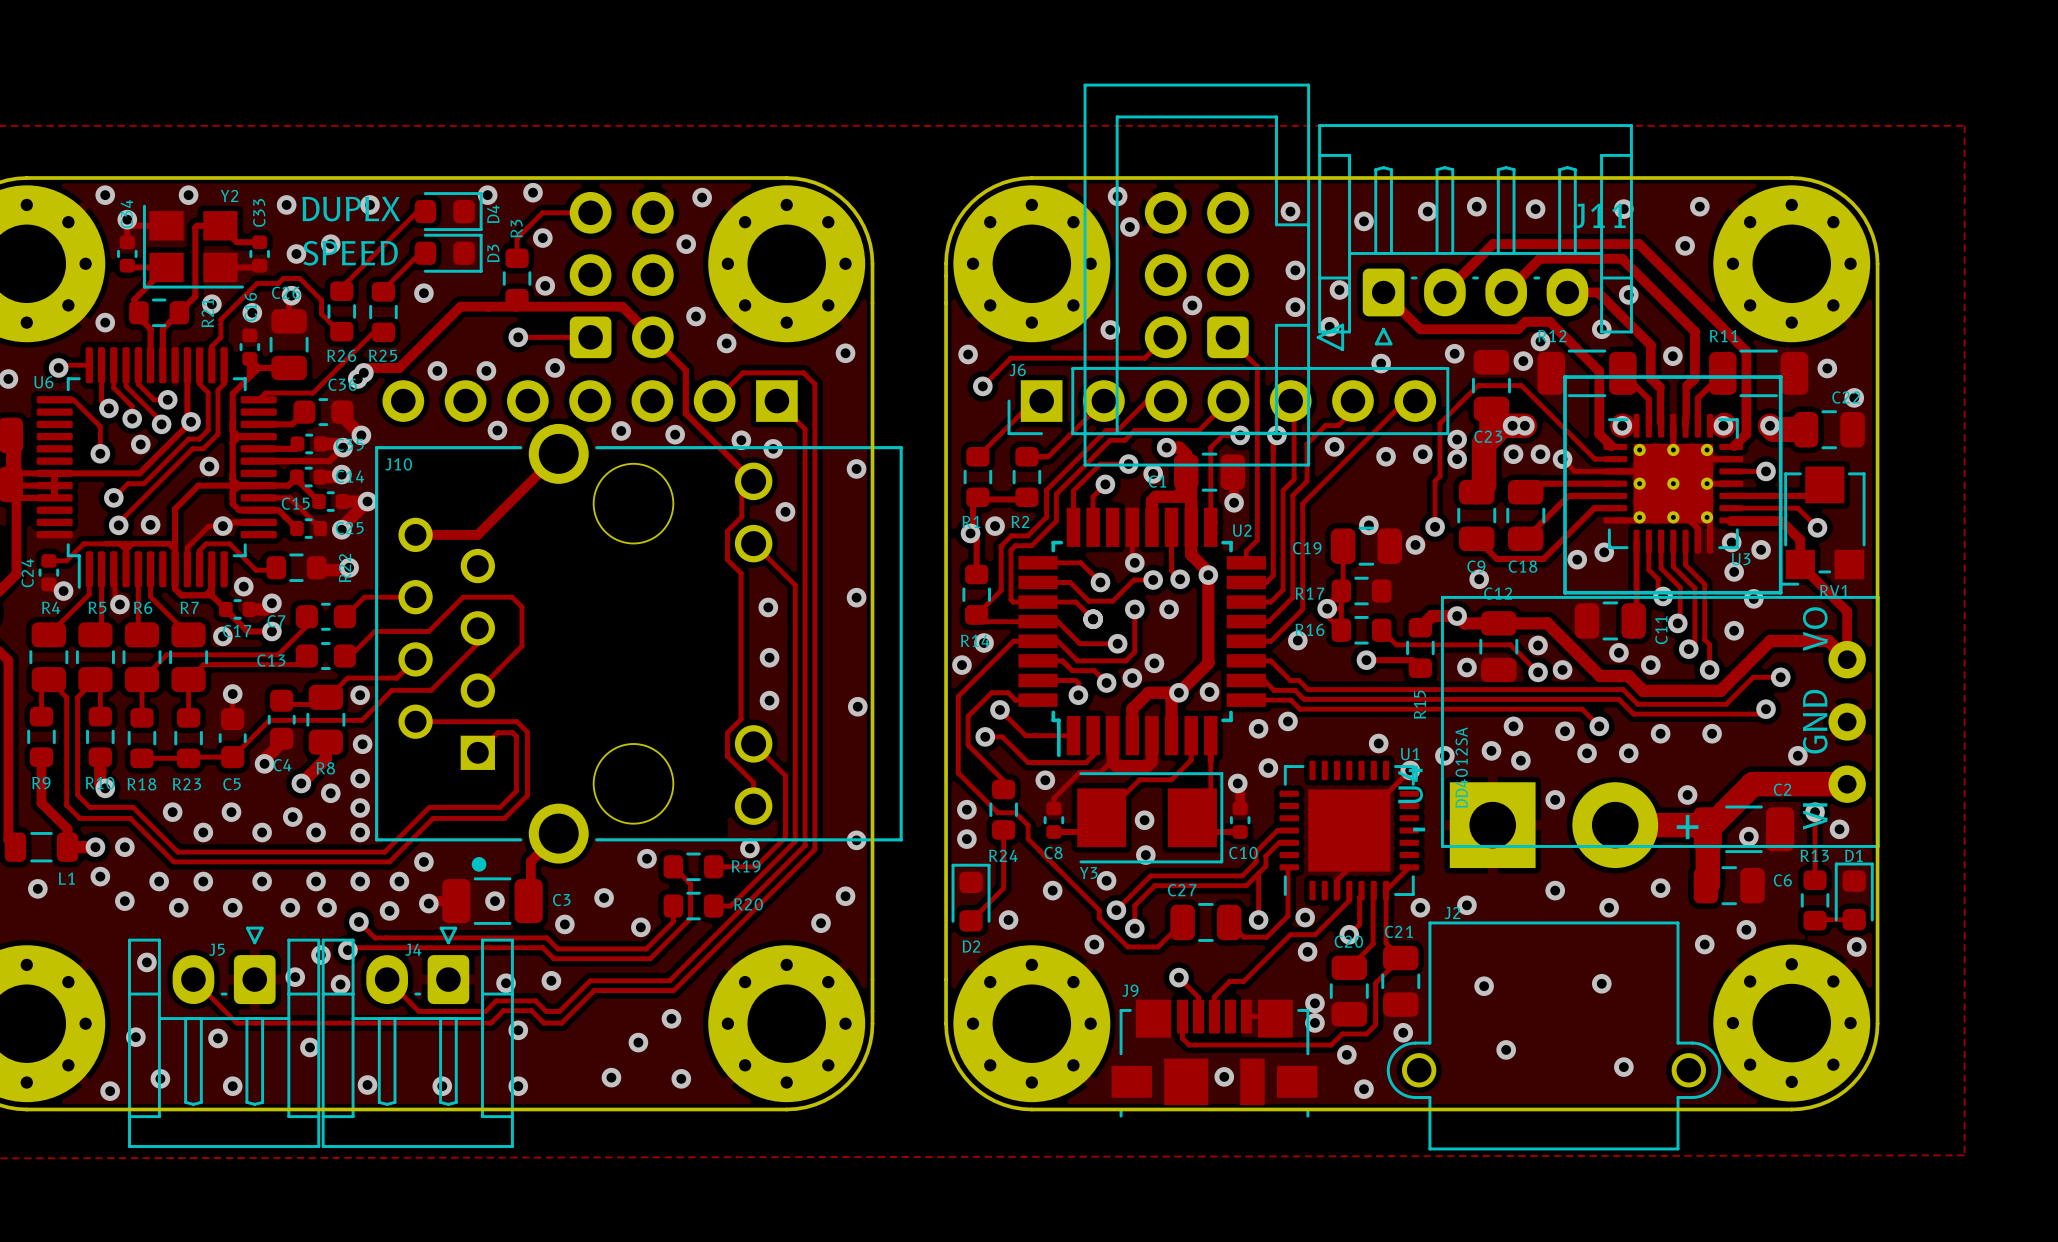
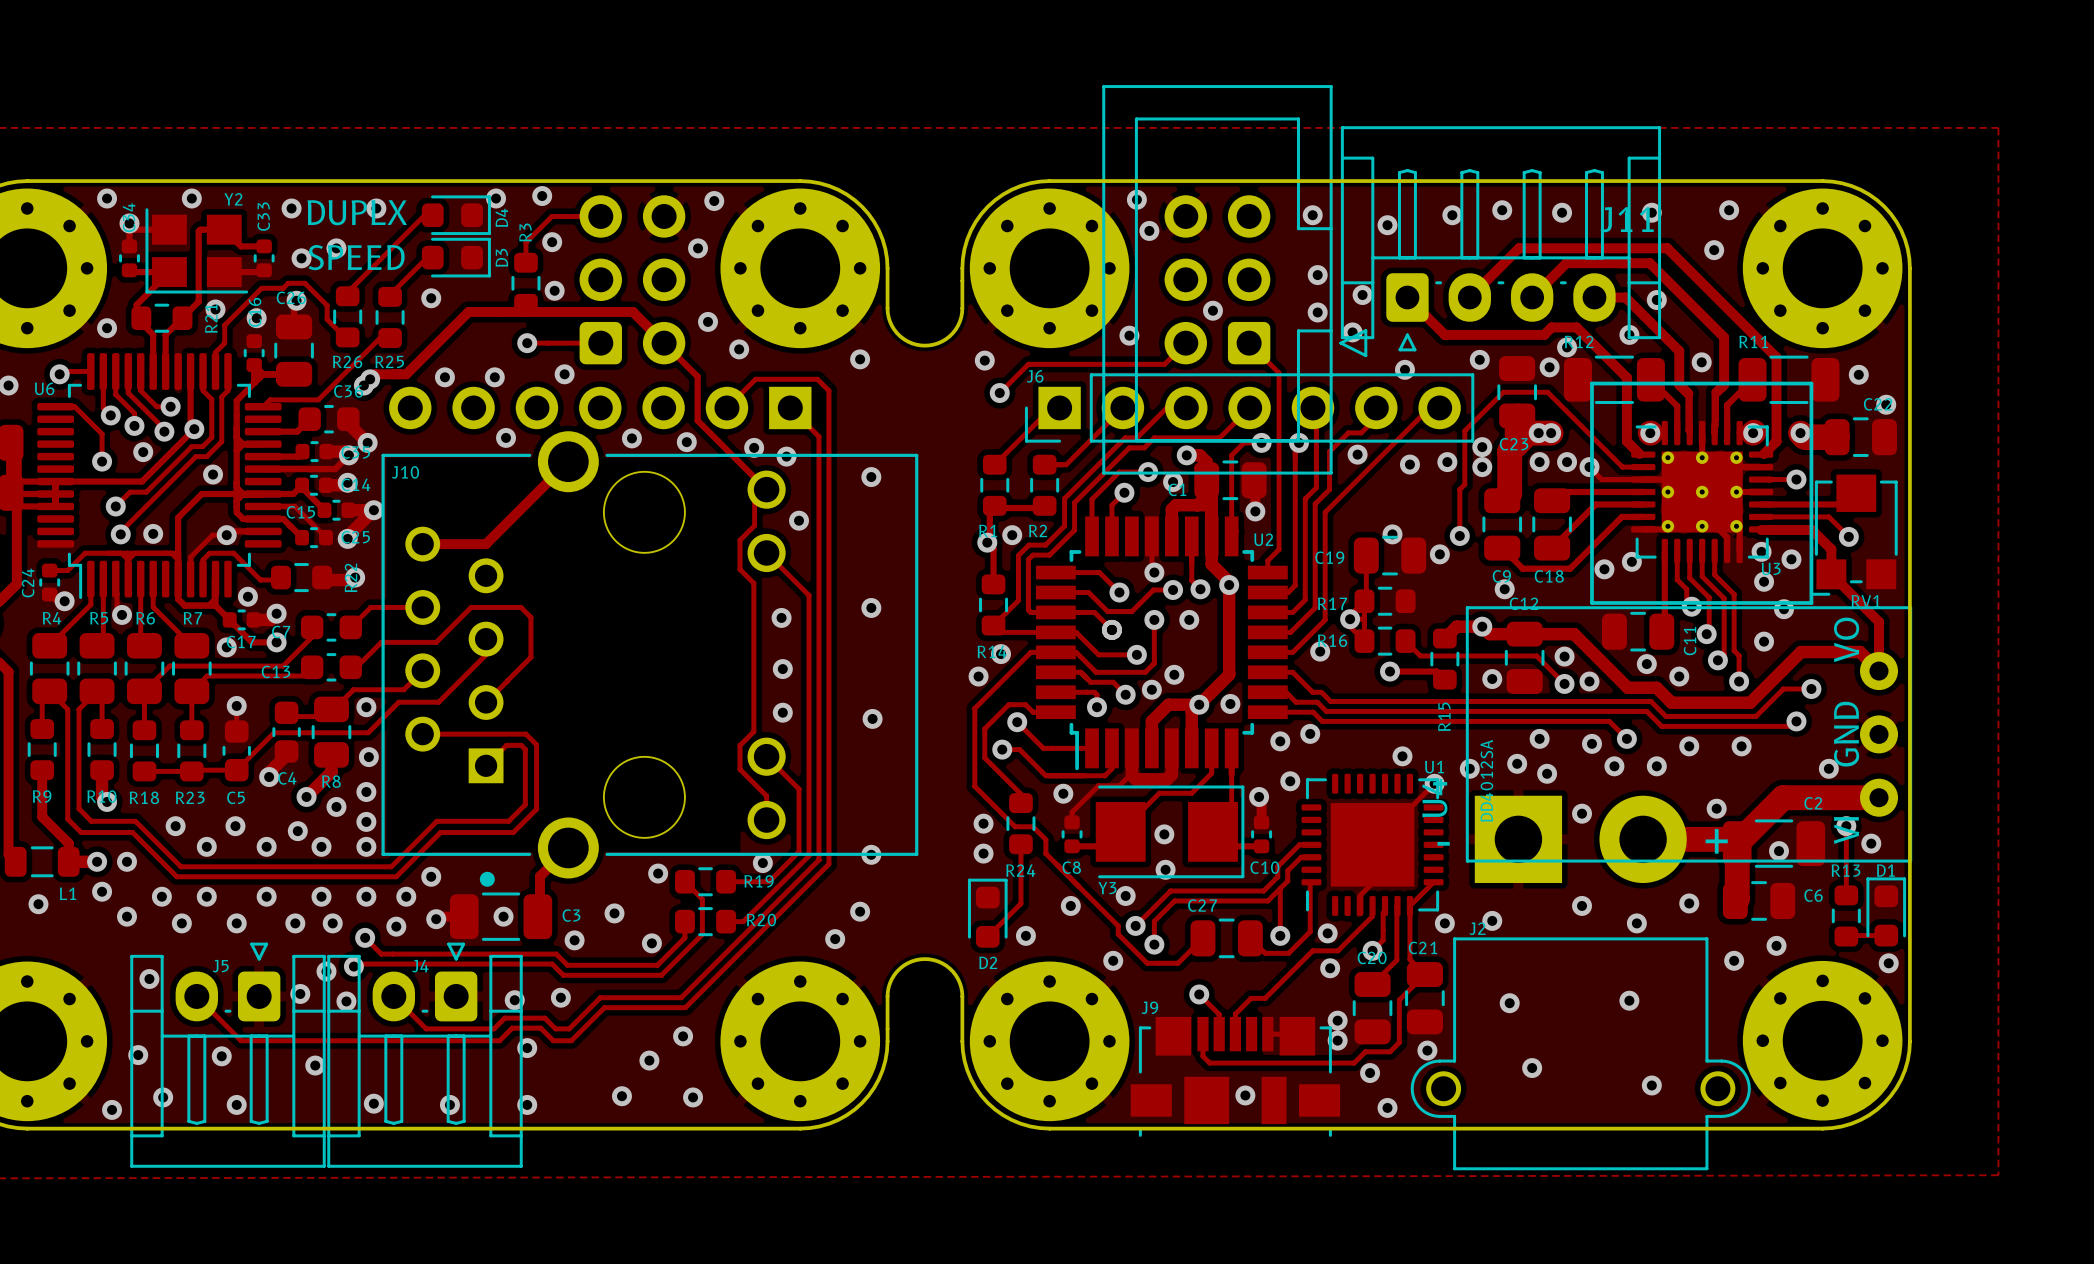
board edge: (872, 303) (872, 979) -> (962, 996) (958, 979) (949, 968) (938, 961) (924, 959) (907, 963) (896, 971) (889, 983) (887, 996)
board edge: (946, 303) (946, 979) -> (962, 308) (959, 321) (952, 333) (942, 341) (924, 345) (911, 343) (900, 336) (891, 325) (887, 308)

